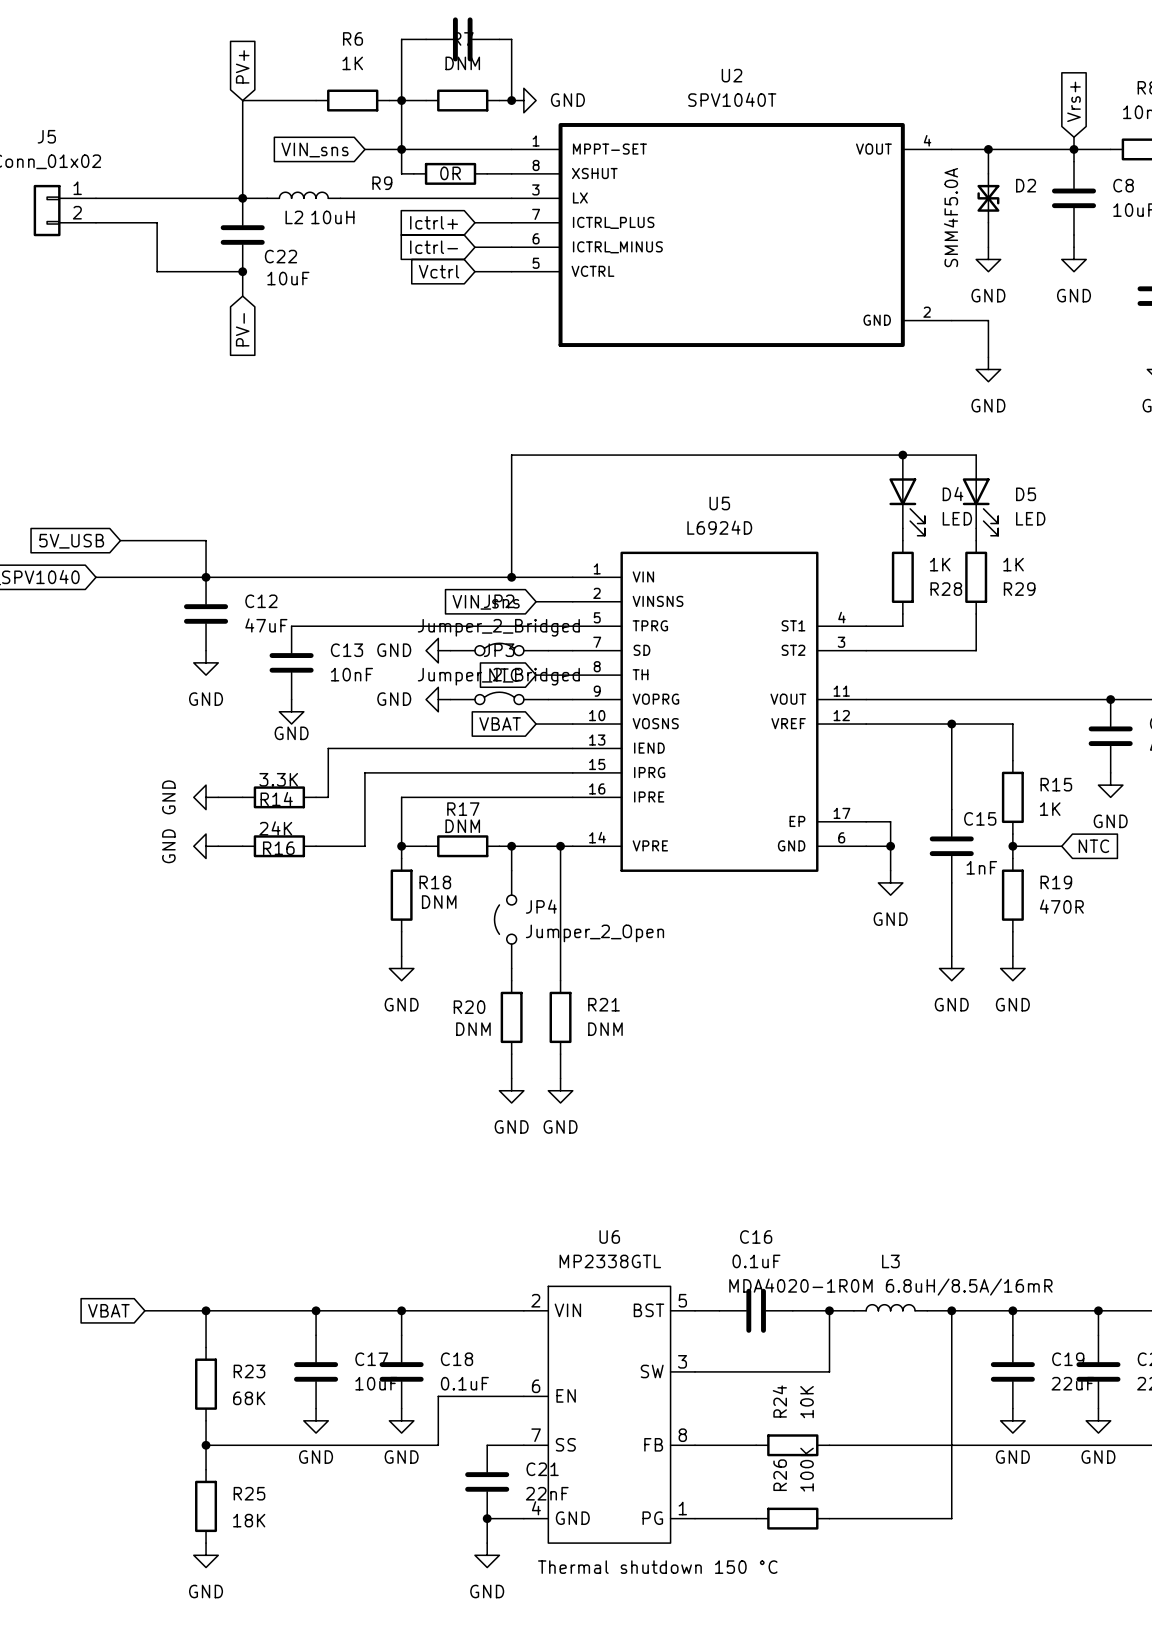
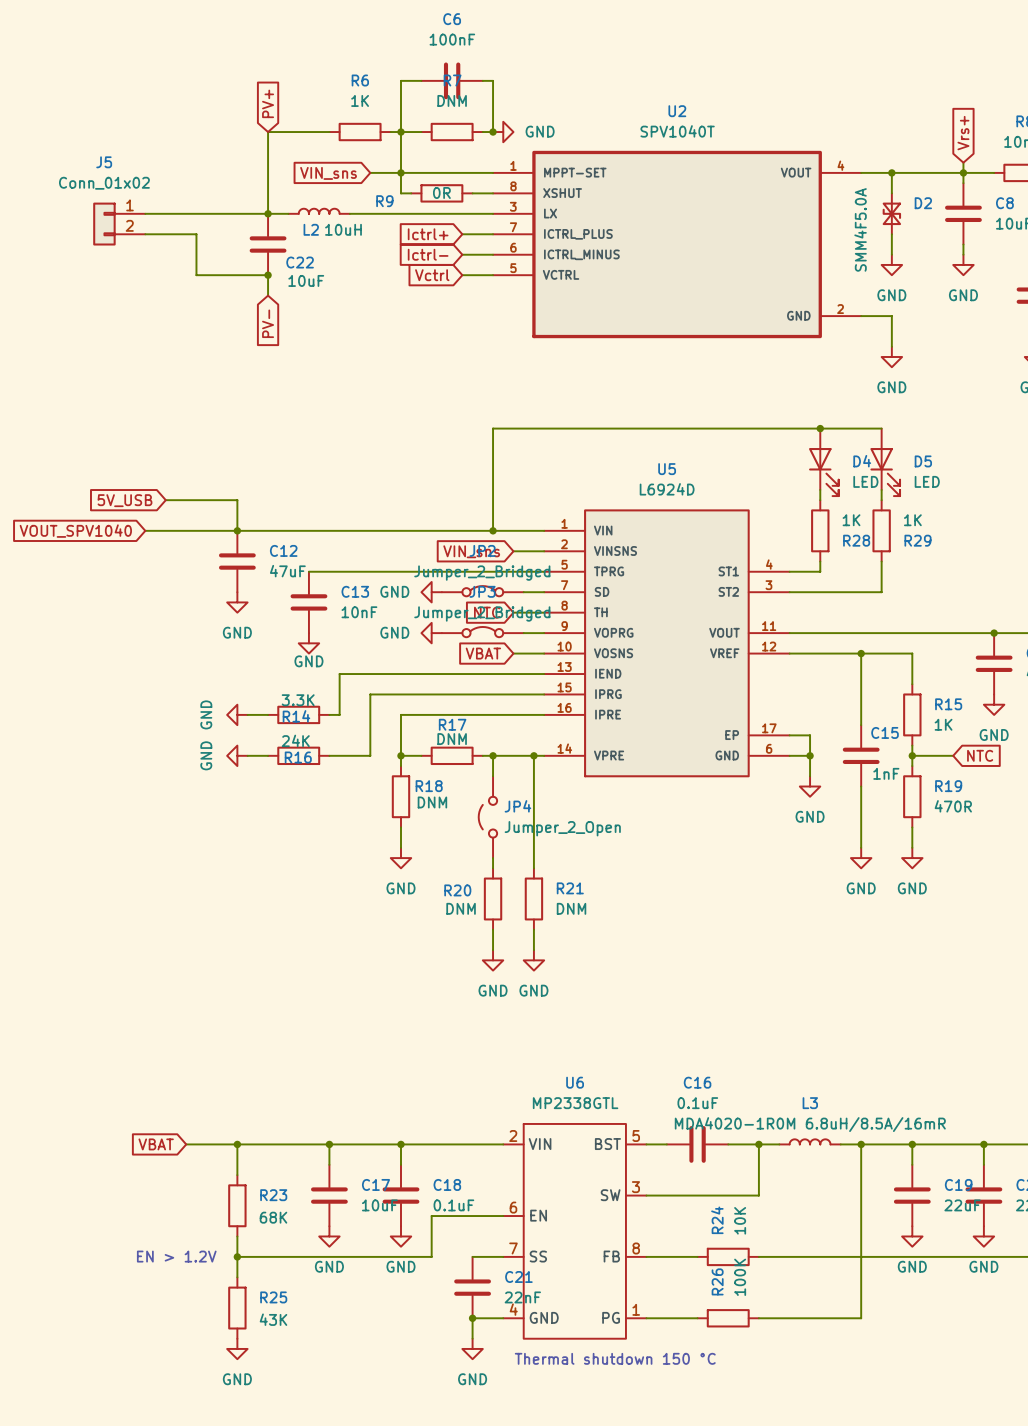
text: none -> EN > 1.2V (176, 1256)
R25 value: 18K (249, 1520) -> 43K (273, 1319)

